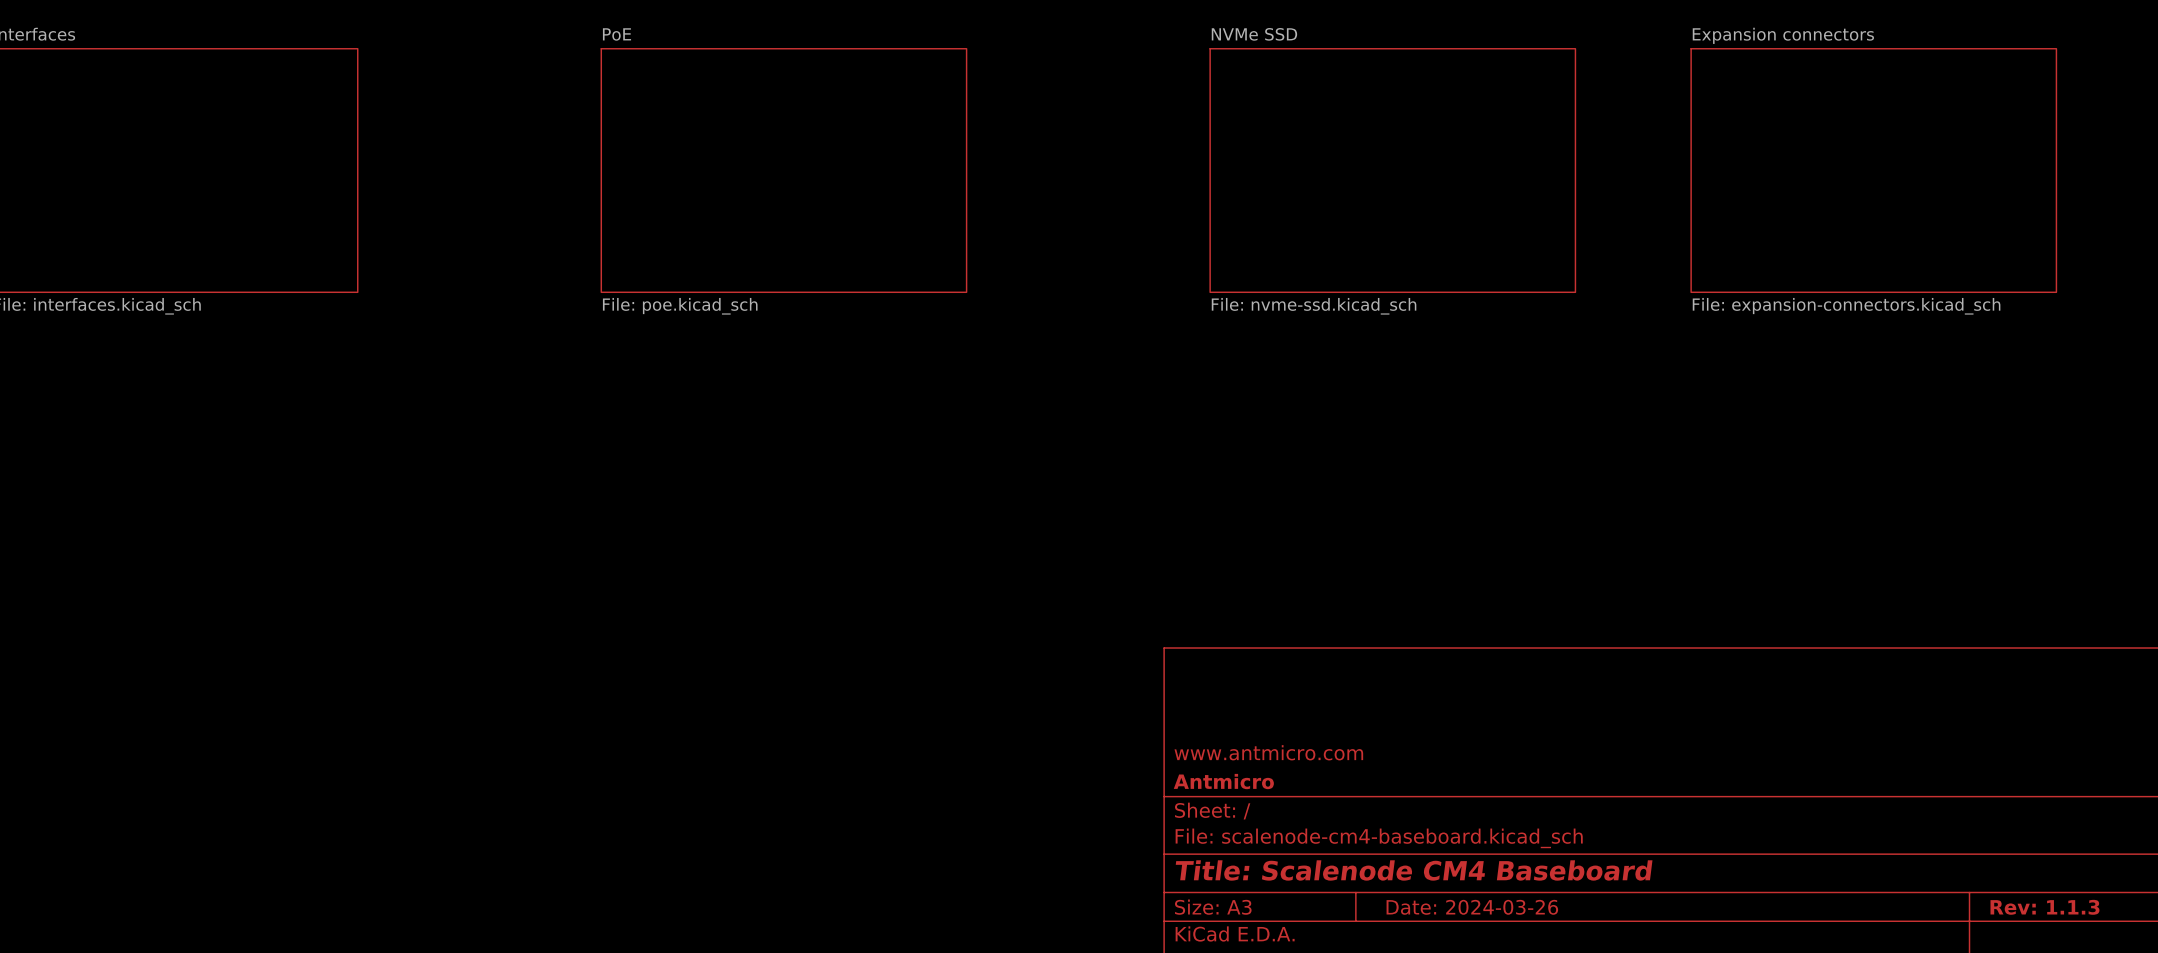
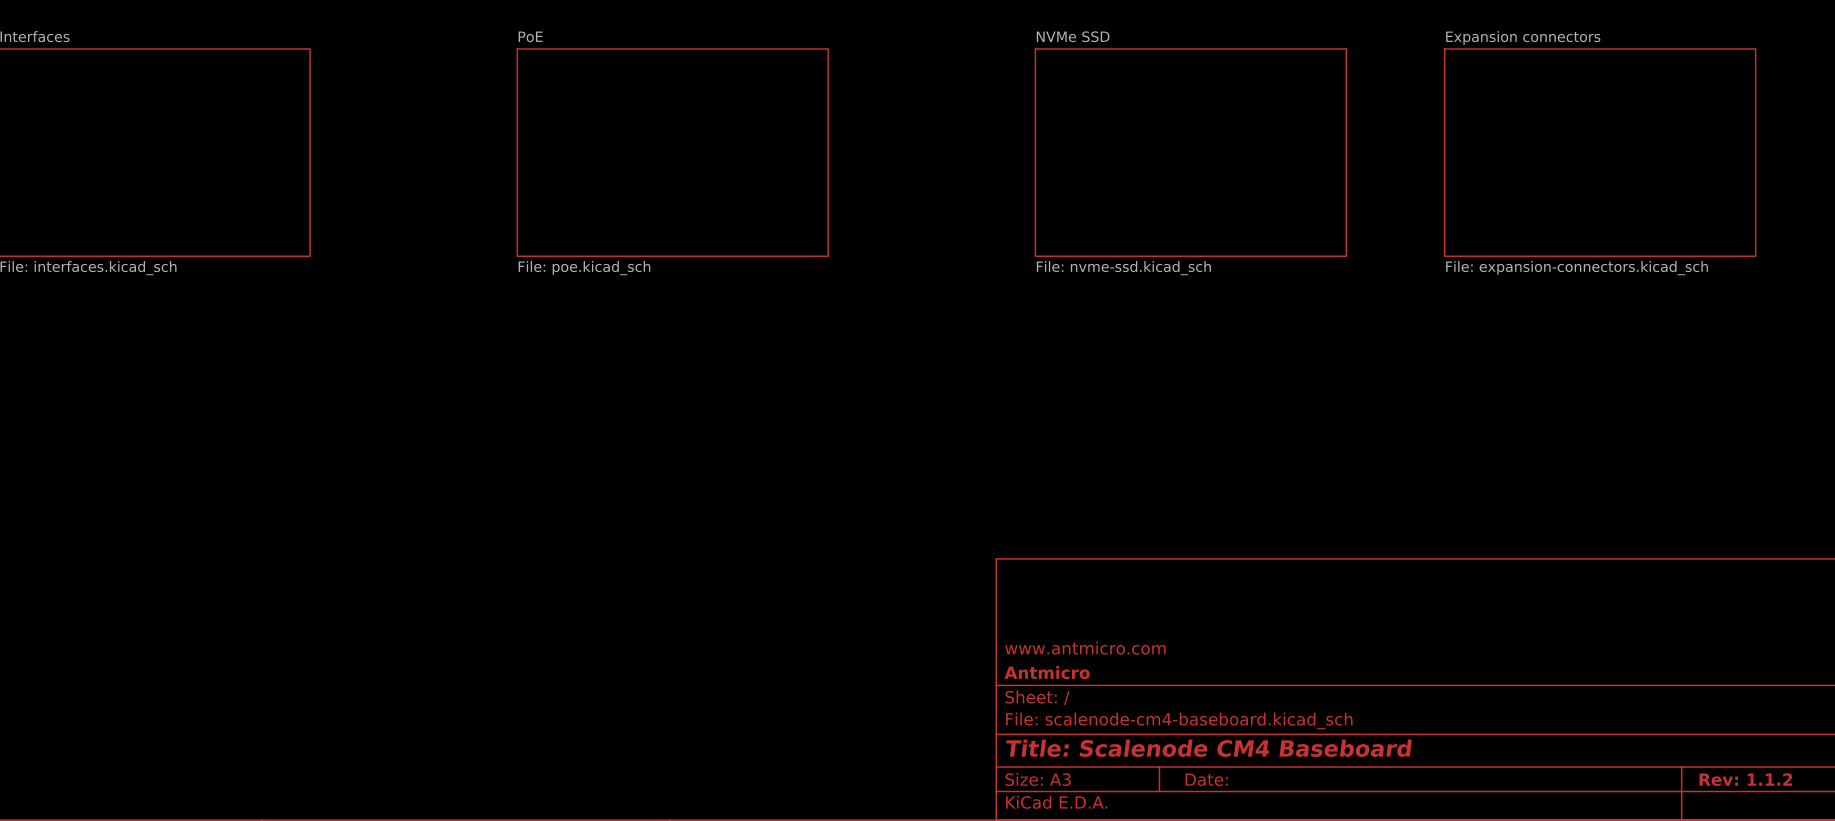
title block: Date: 2024-03-26 (1472, 907) -> Date: (1206, 779)
title block: Rev: 1.1.3 (2044, 907) -> Rev: 1.1.2 (1745, 779)

